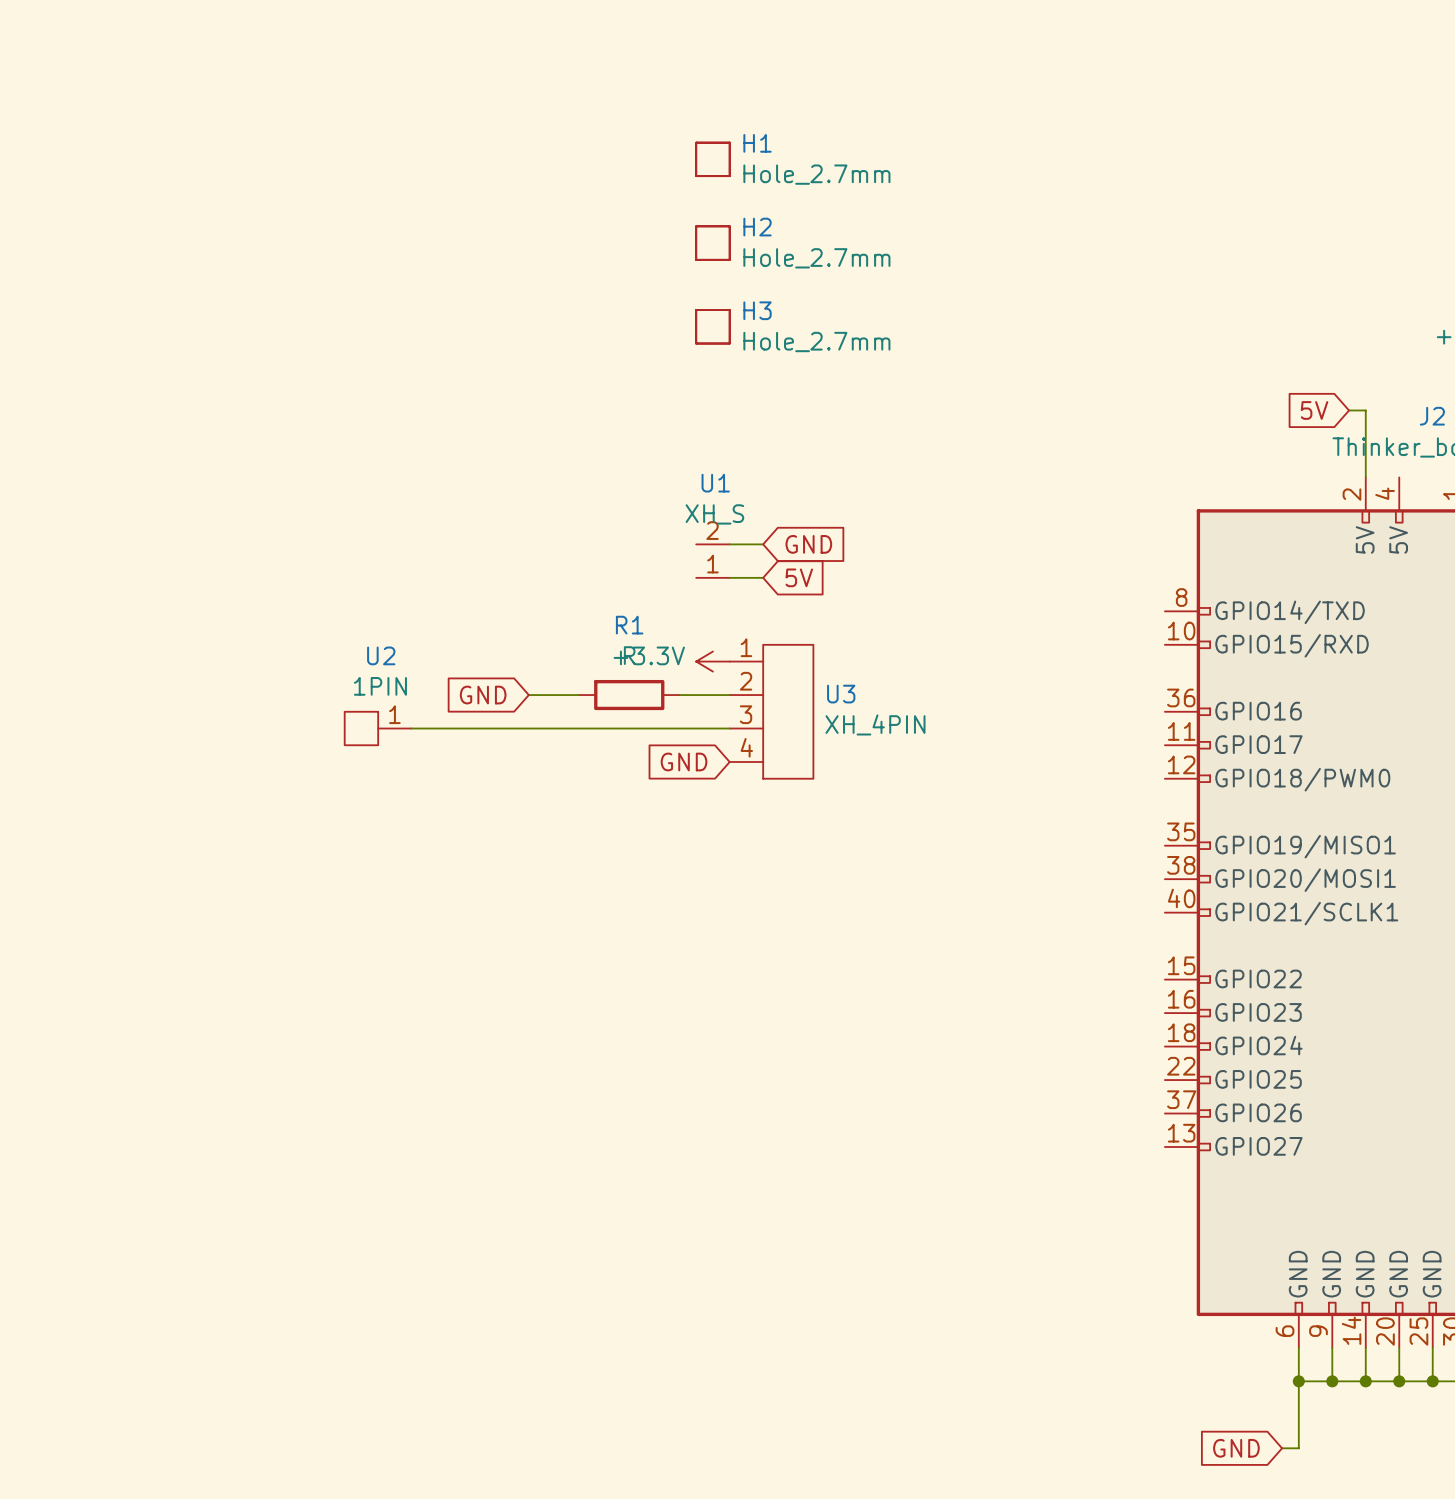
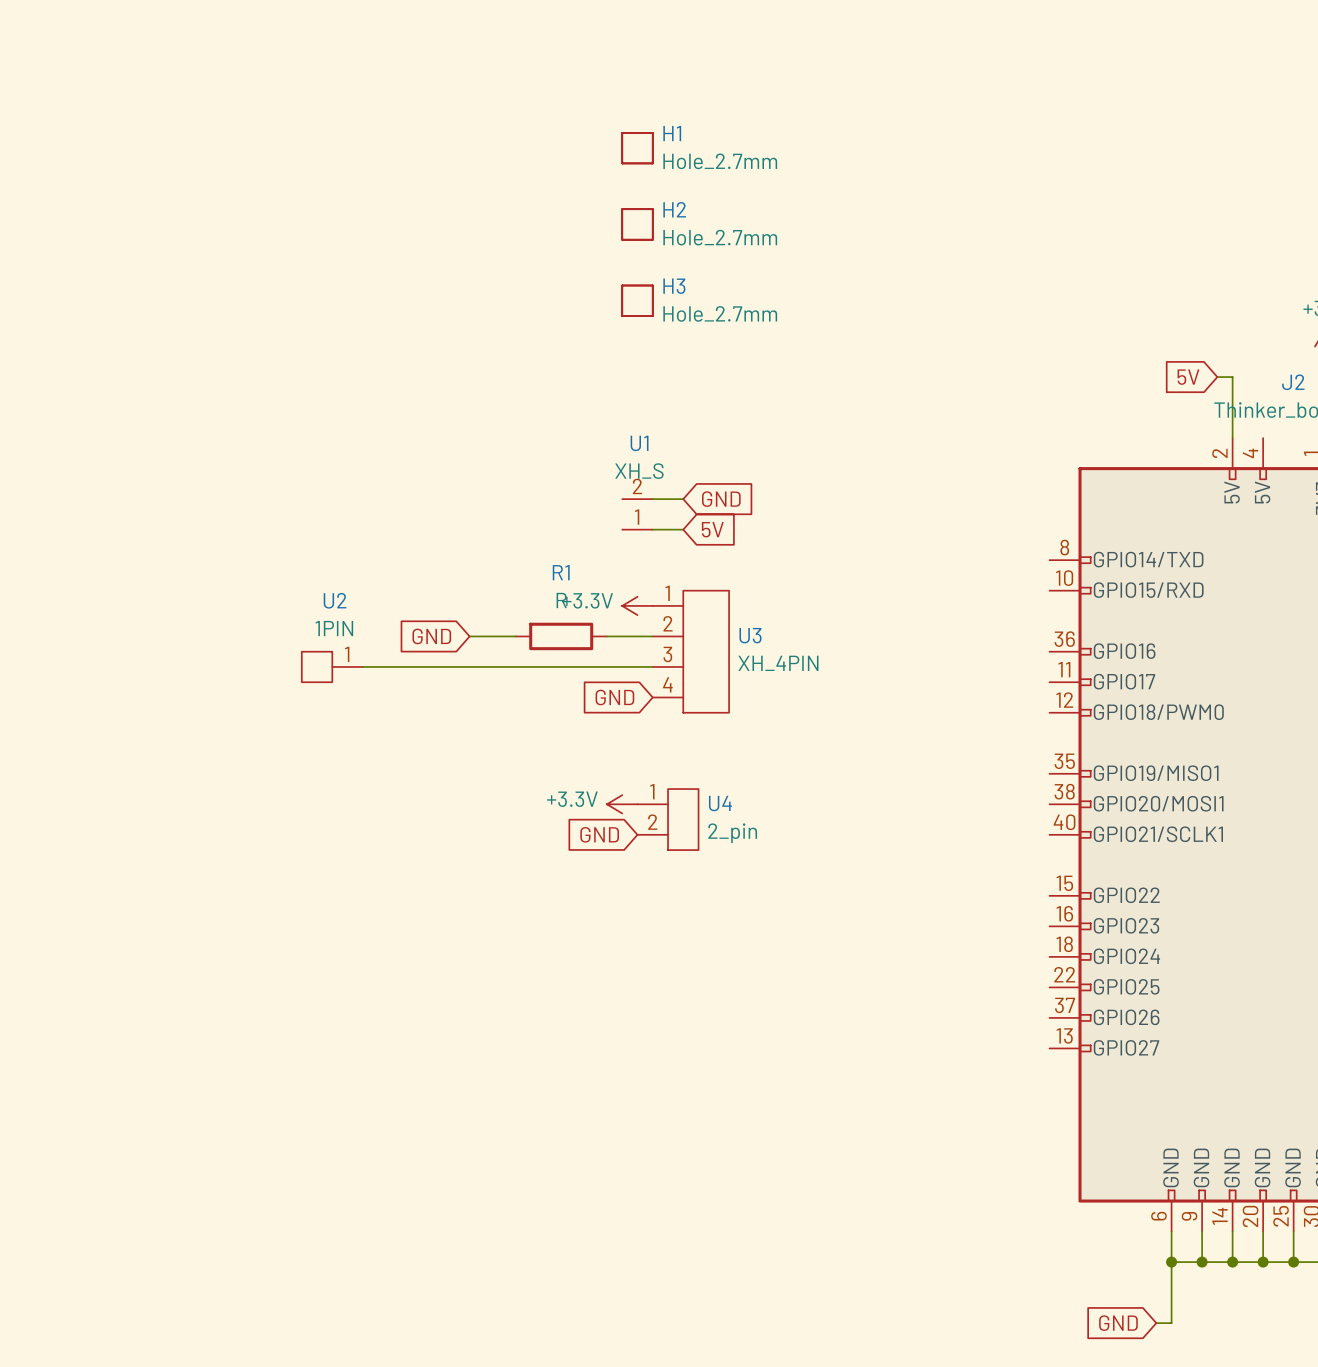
power symbol: none -> +3.3V (622, 804)
U4: none -> 2_pin (668, 819)
global label: none -> GND (599, 834)

